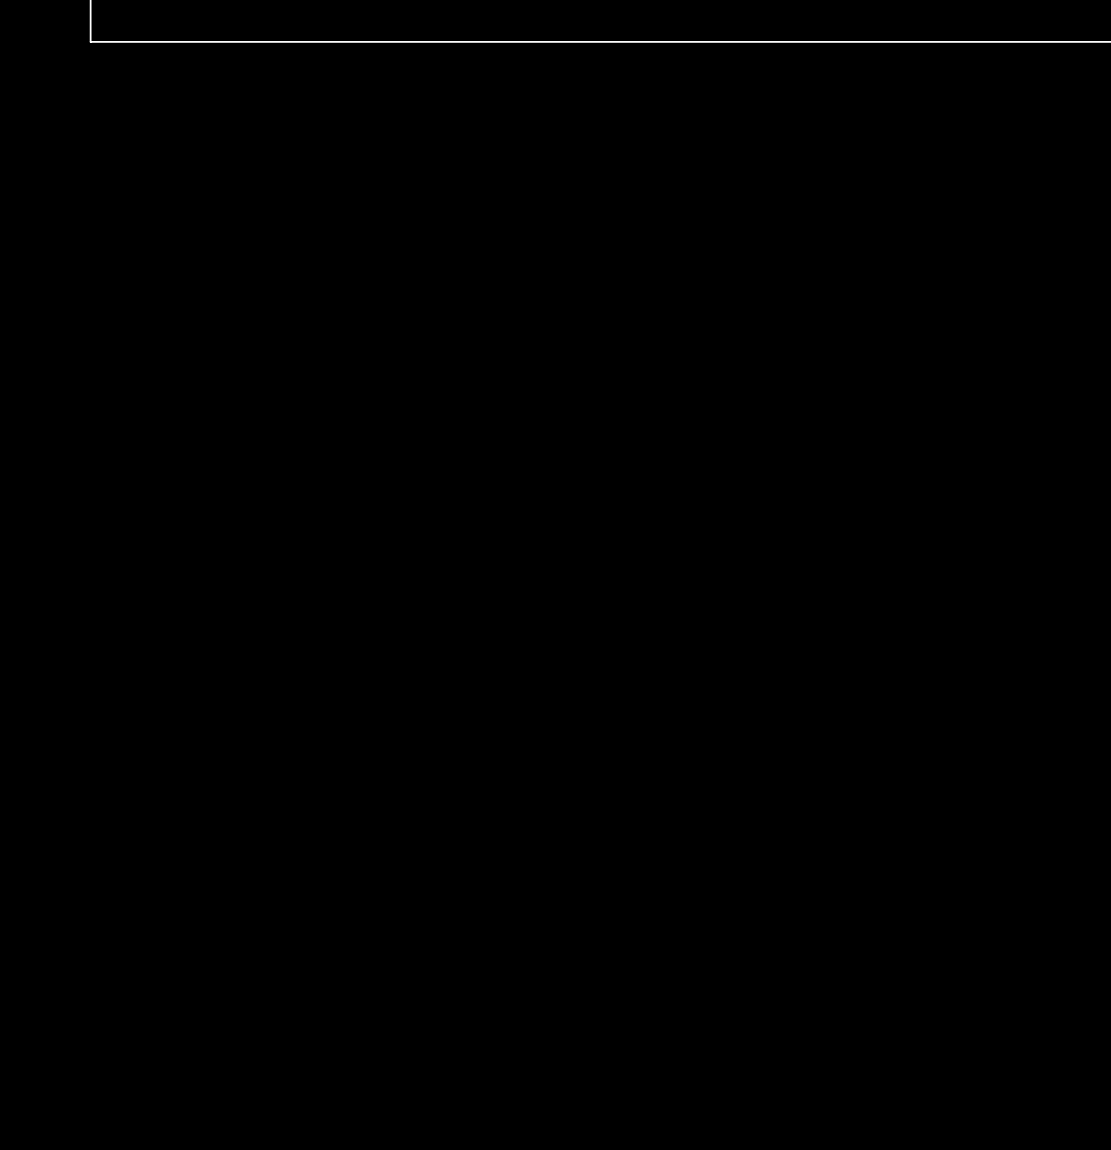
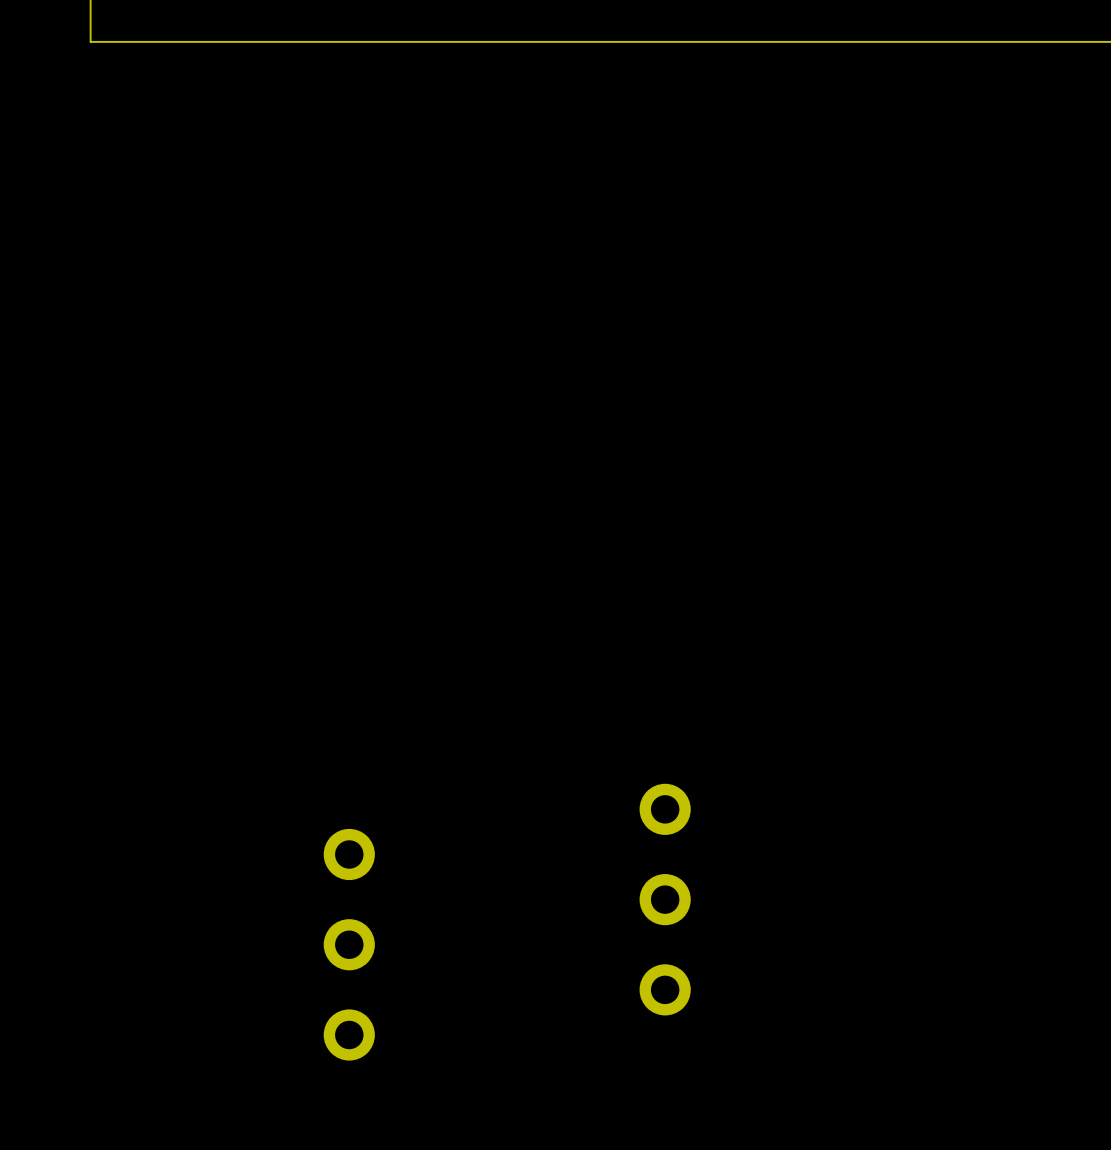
part: none -> (665, 899)
part: none -> (349, 944)

